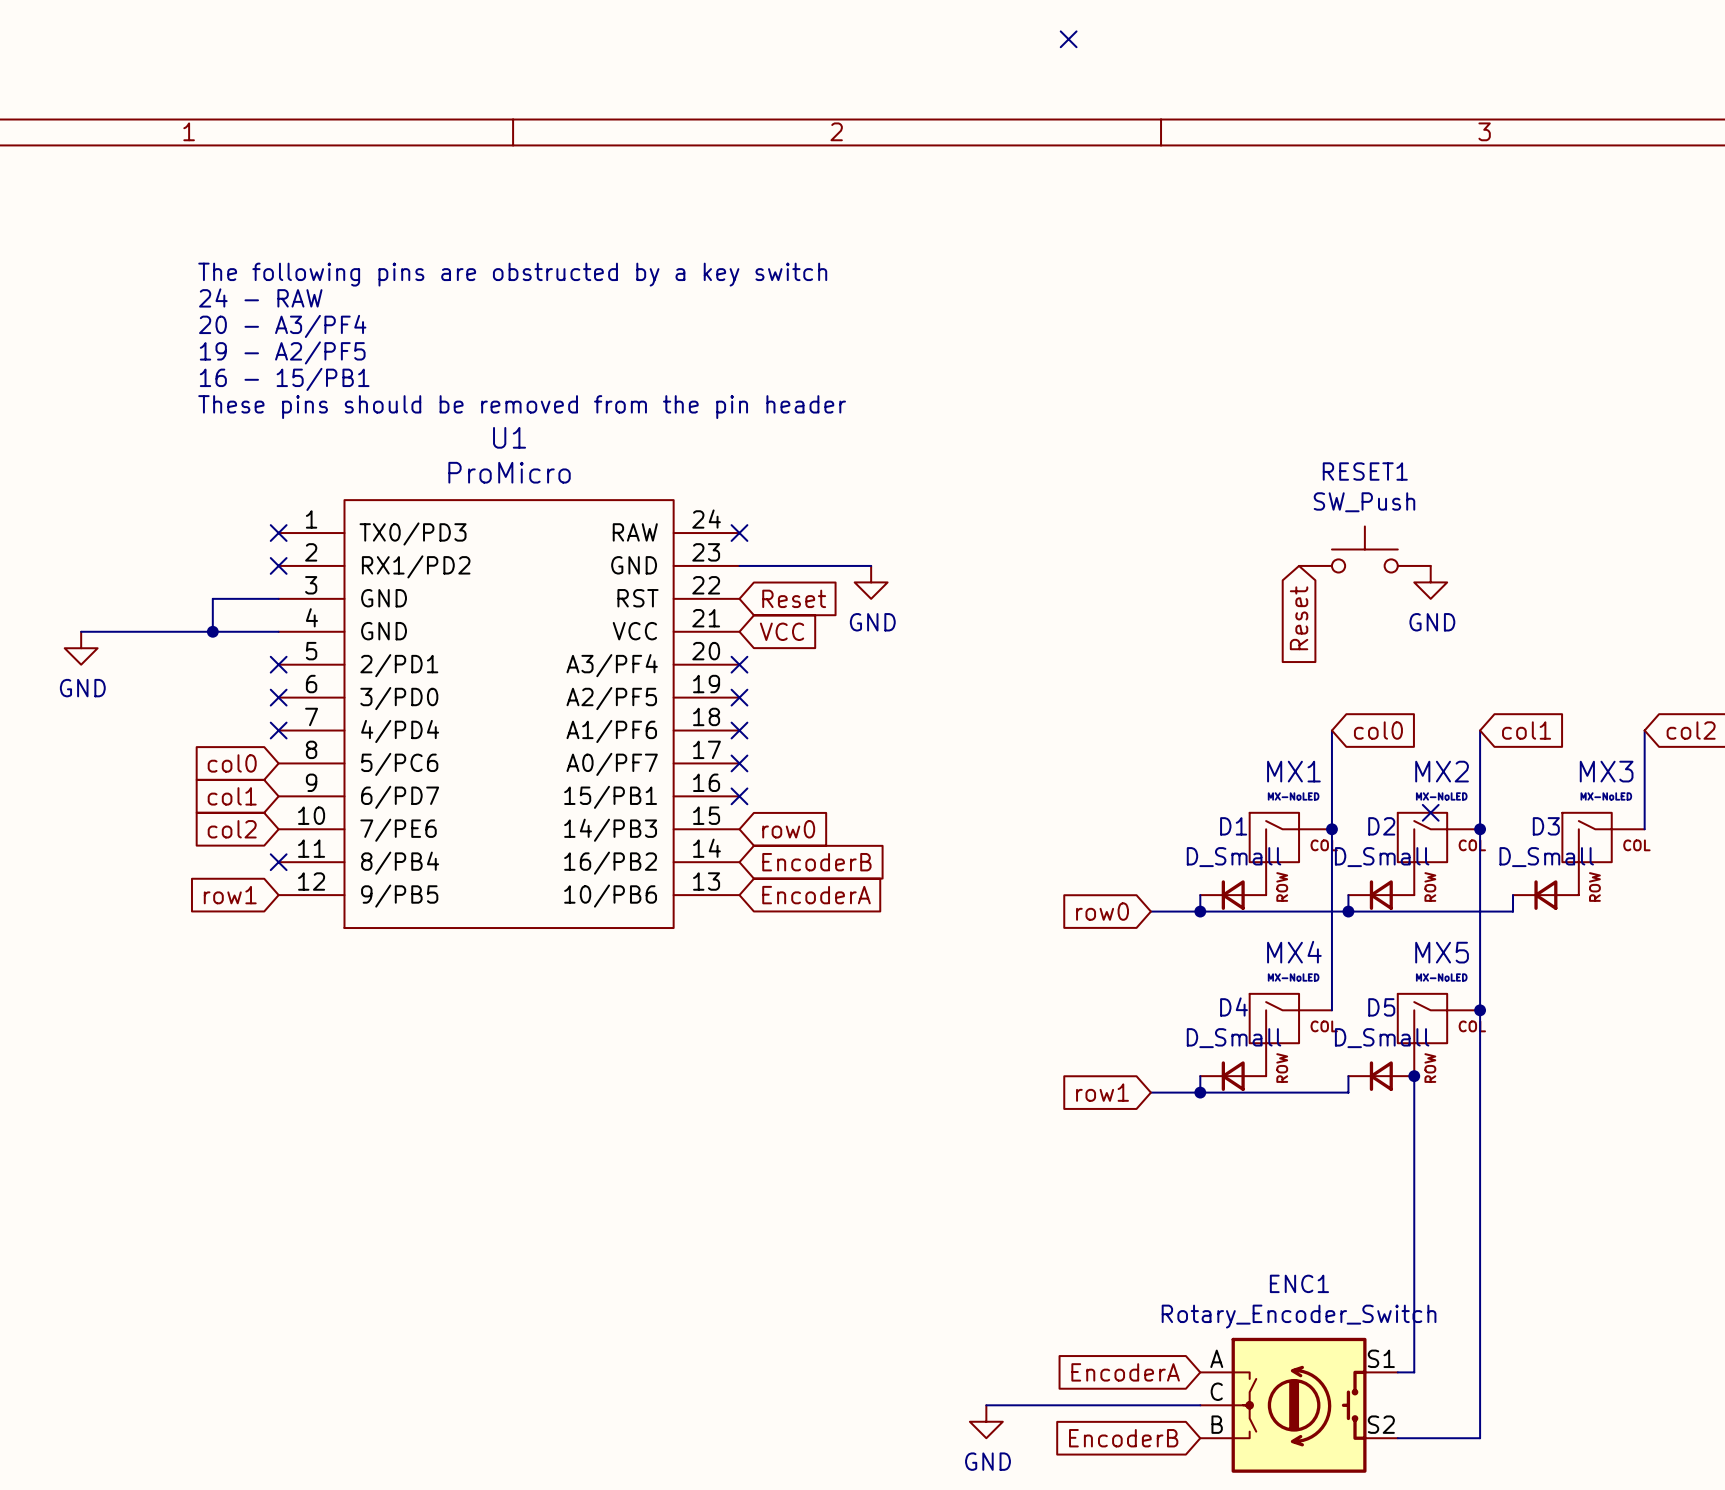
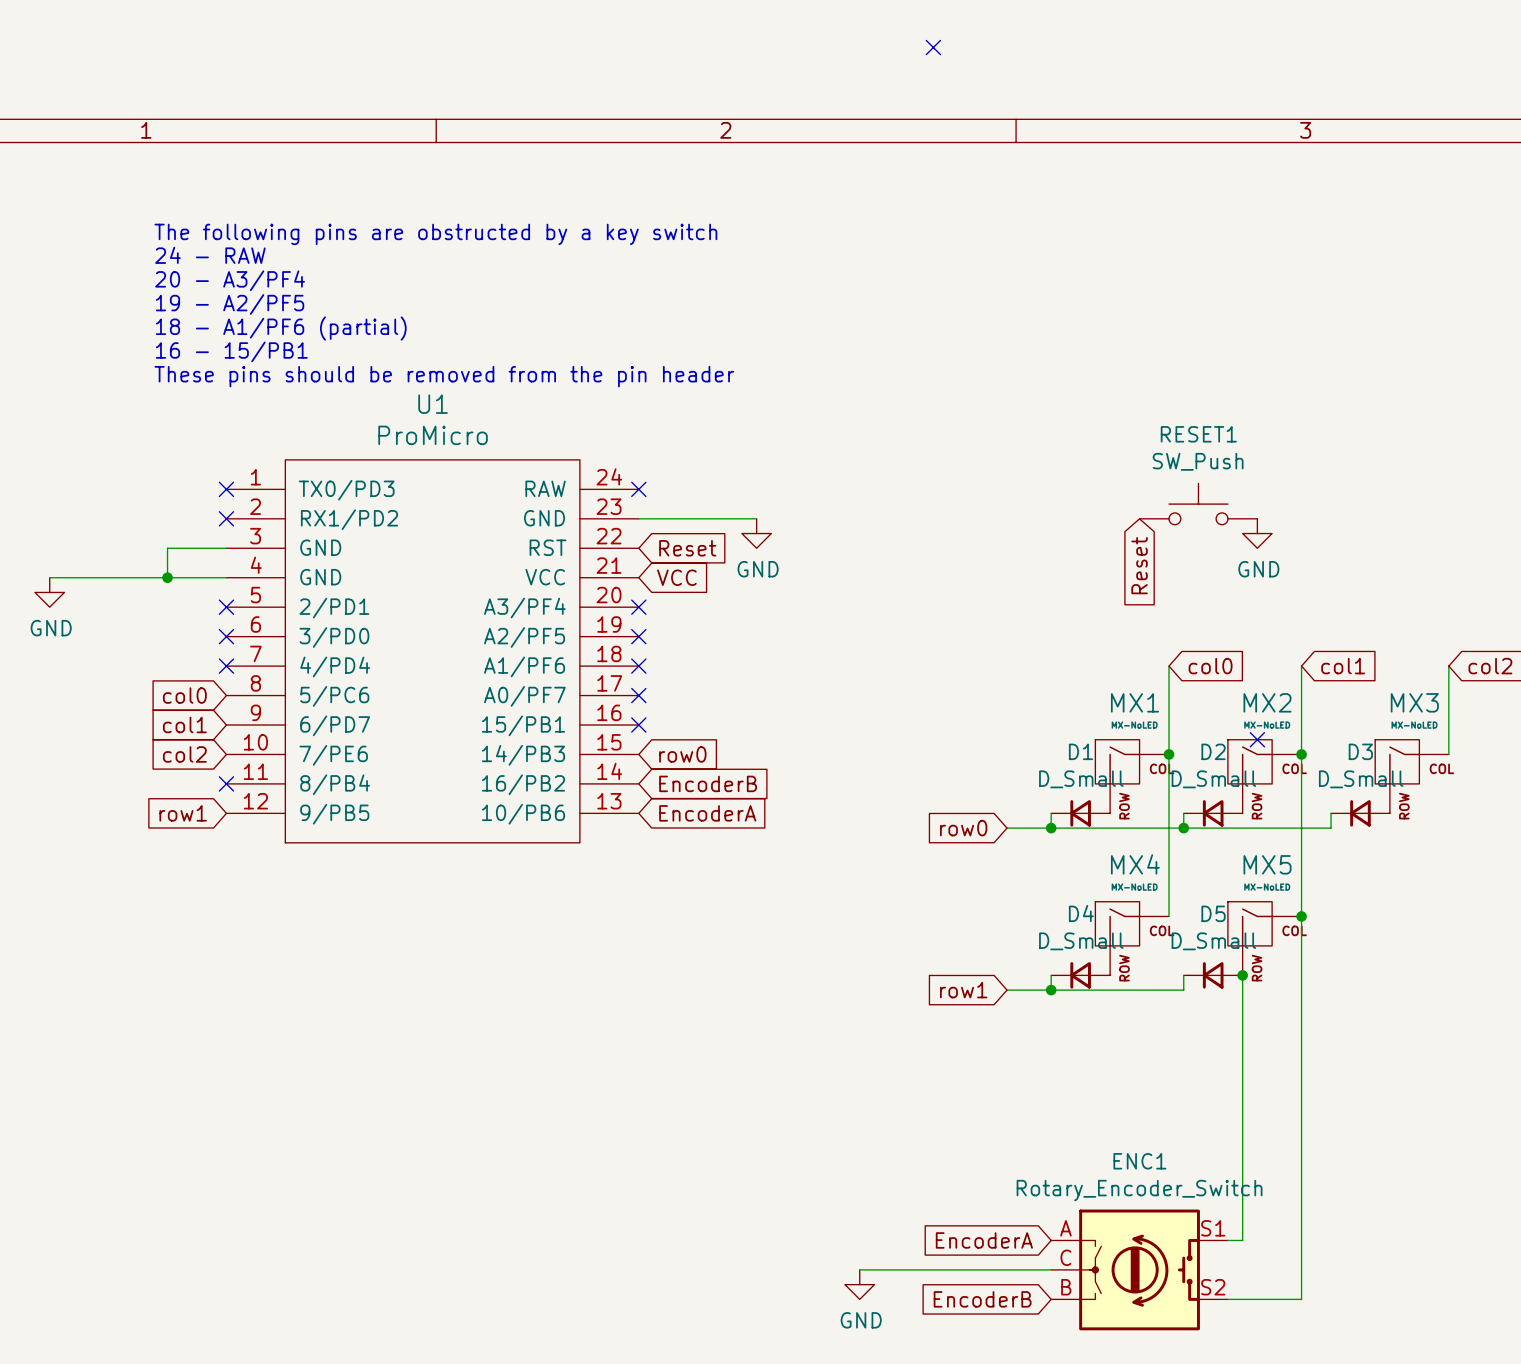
text: none -> The following pins are obstructed by a key switch (435, 234)
text: The following pins are obstructed by a key switch (512, 274) -> 24 - RAW (210, 255)
text: 24 - RAW (260, 297) -> 20 - A3/PF4 (230, 280)
text: 20 - A3/PF4 (282, 326) -> 19 - A2/PF5 (230, 304)
text: 19 - A2/PF5 (282, 352) -> 18 - A1/PF6 (partial) (281, 328)

